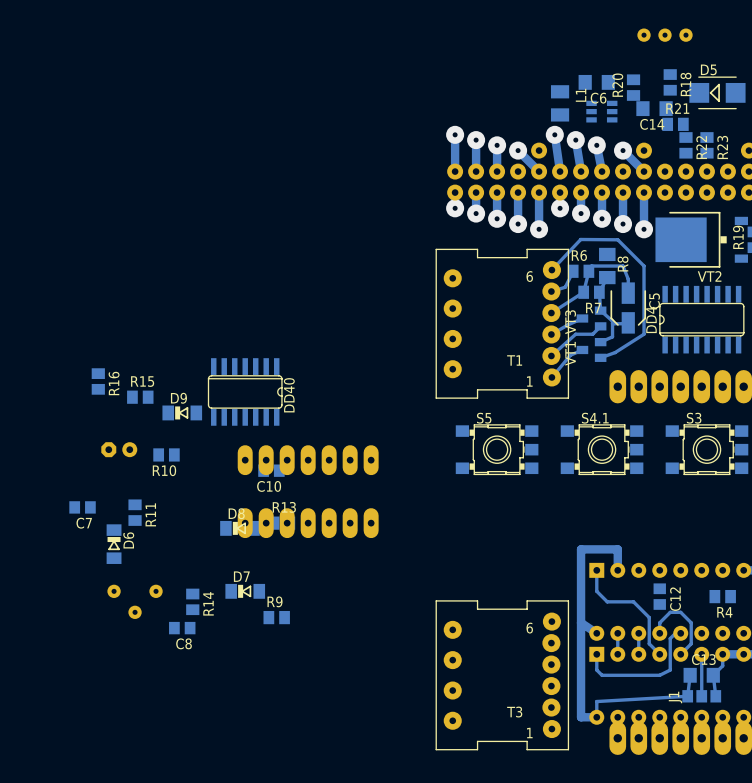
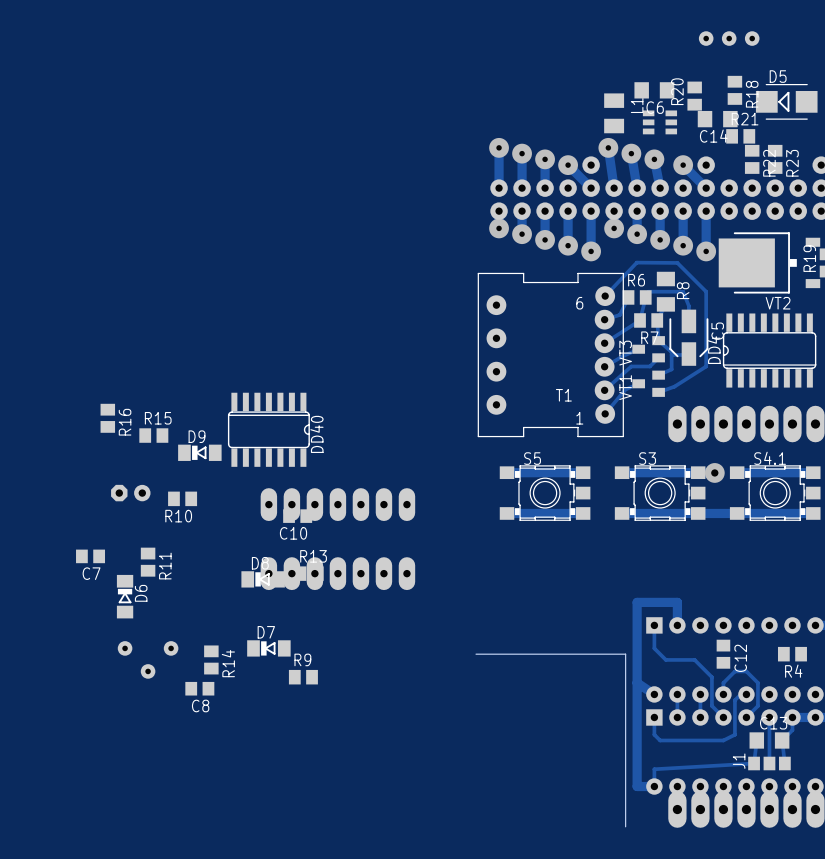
S4.1 name: S4.1 (595, 418) -> S3 (647, 458)
S3 name: S3 (694, 418) -> S4.1 (770, 458)
track: none -> (583, 472) (507, 472)
track: none -> (622, 472) (714, 472)
via: none -> (714, 472)
track: none -> (813, 472) (737, 472)
track: none -> (583, 513) (507, 513)
track: none -> (813, 513) (622, 513)
board edge: none -> (476, 654) (625, 654) (625, 826)
T3: (502, 675) -> none

